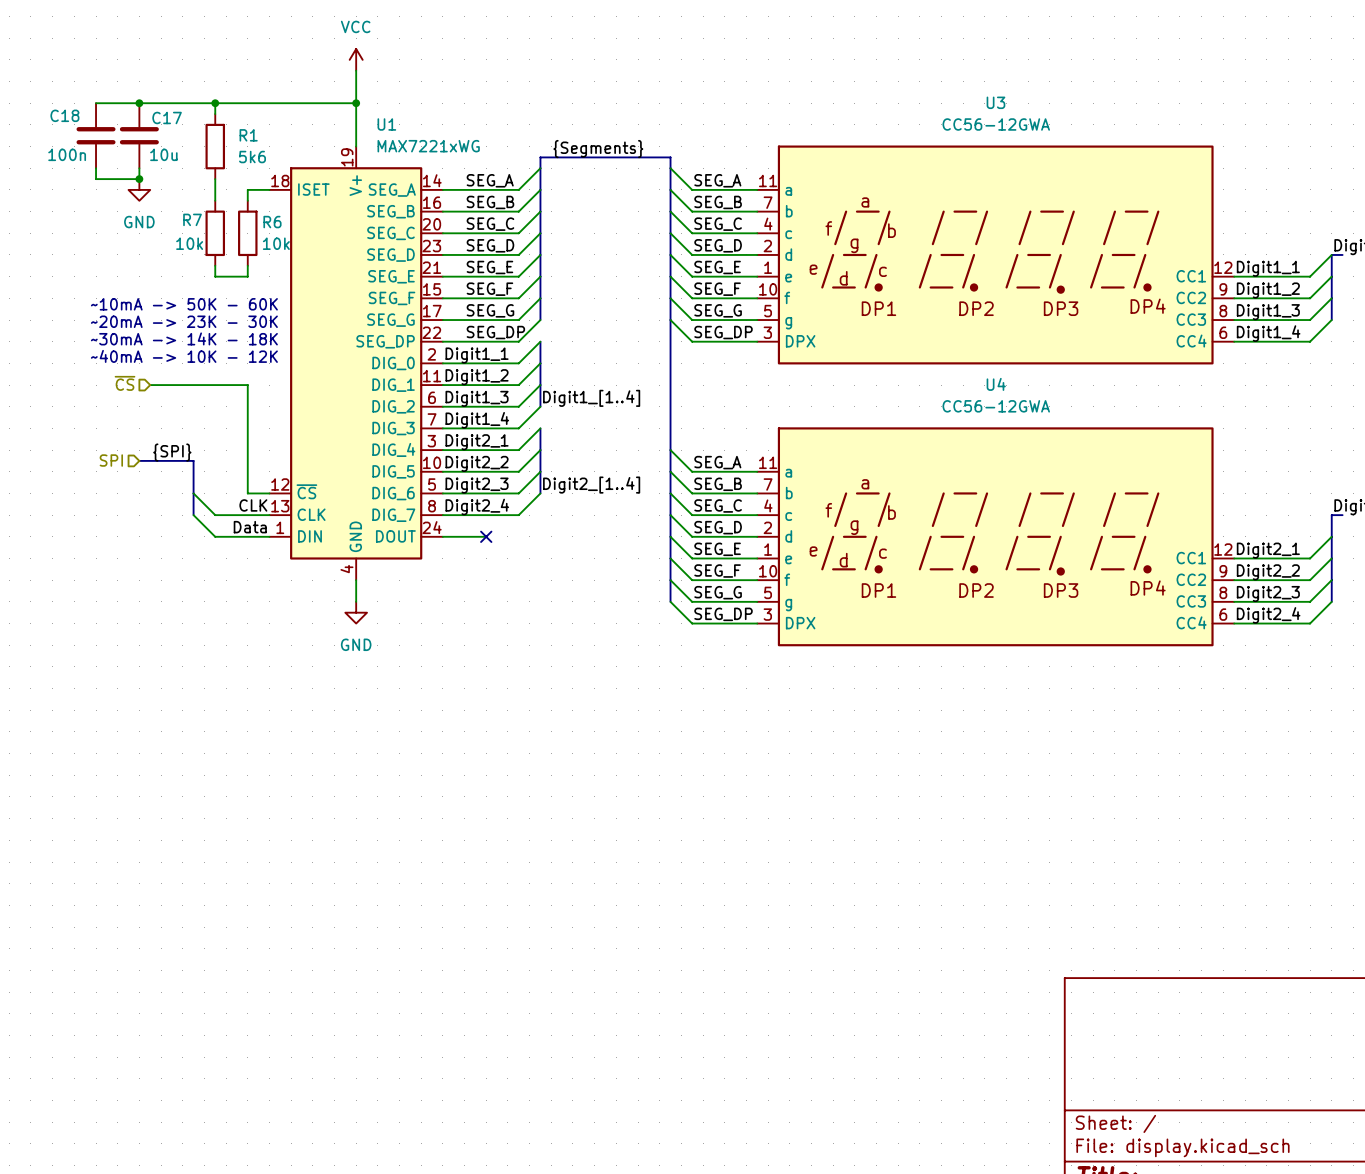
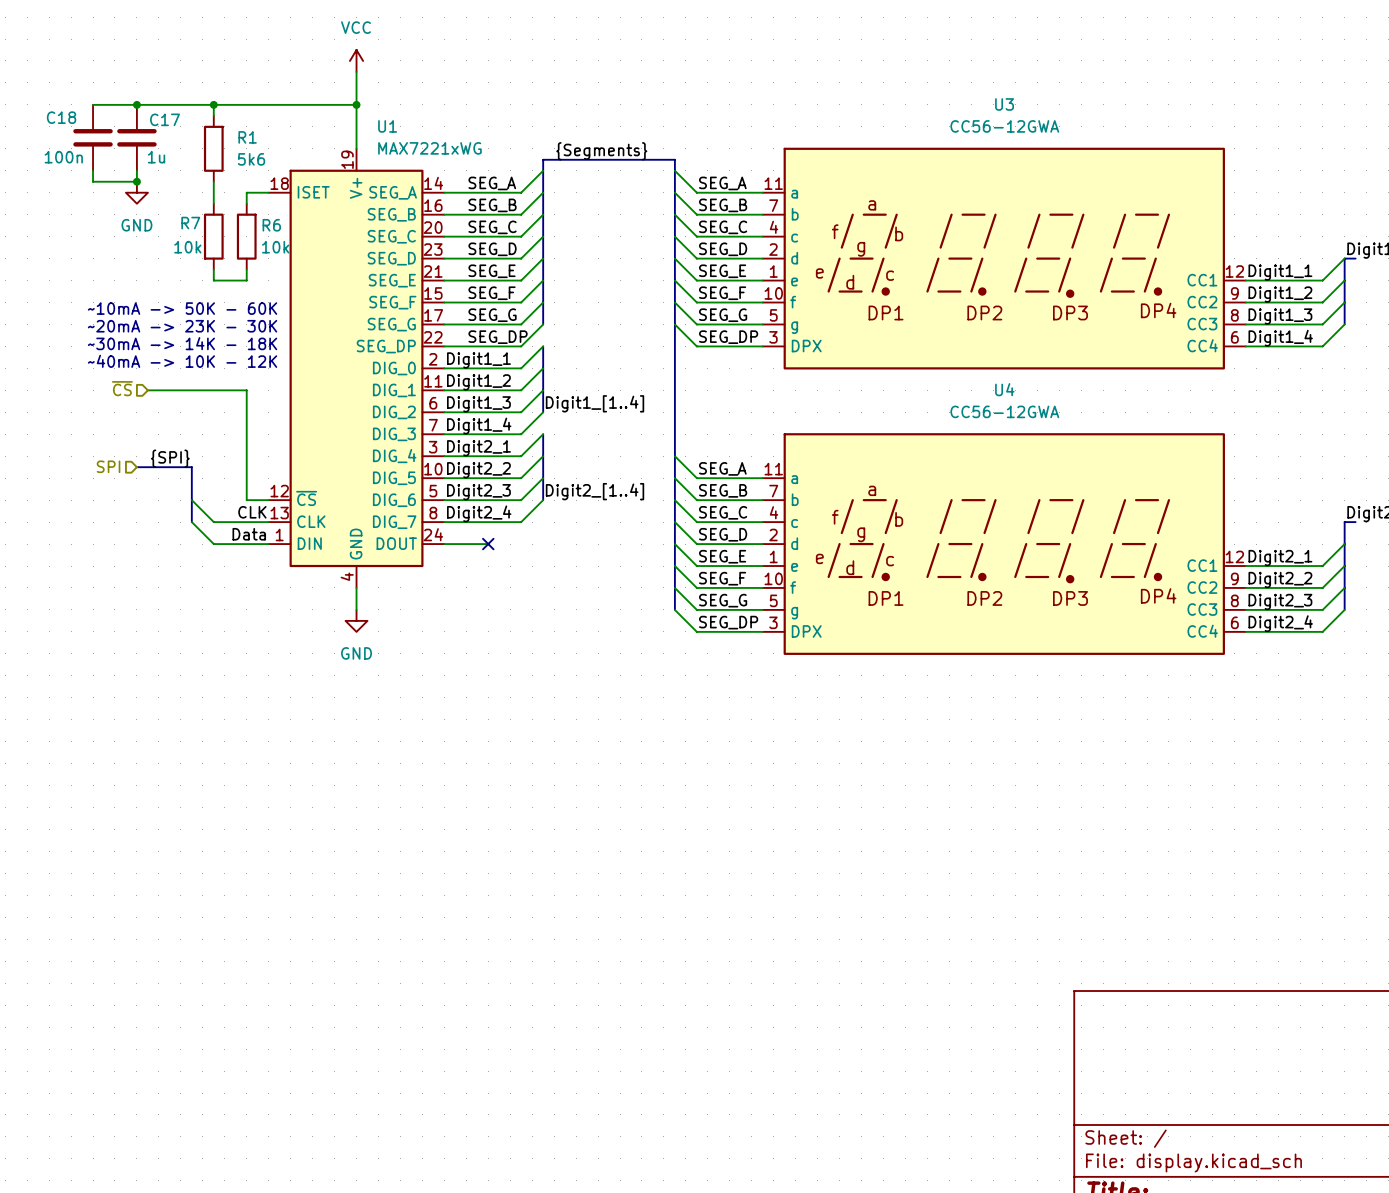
C17 value: 10u (163, 154) -> 1u (156, 157)

